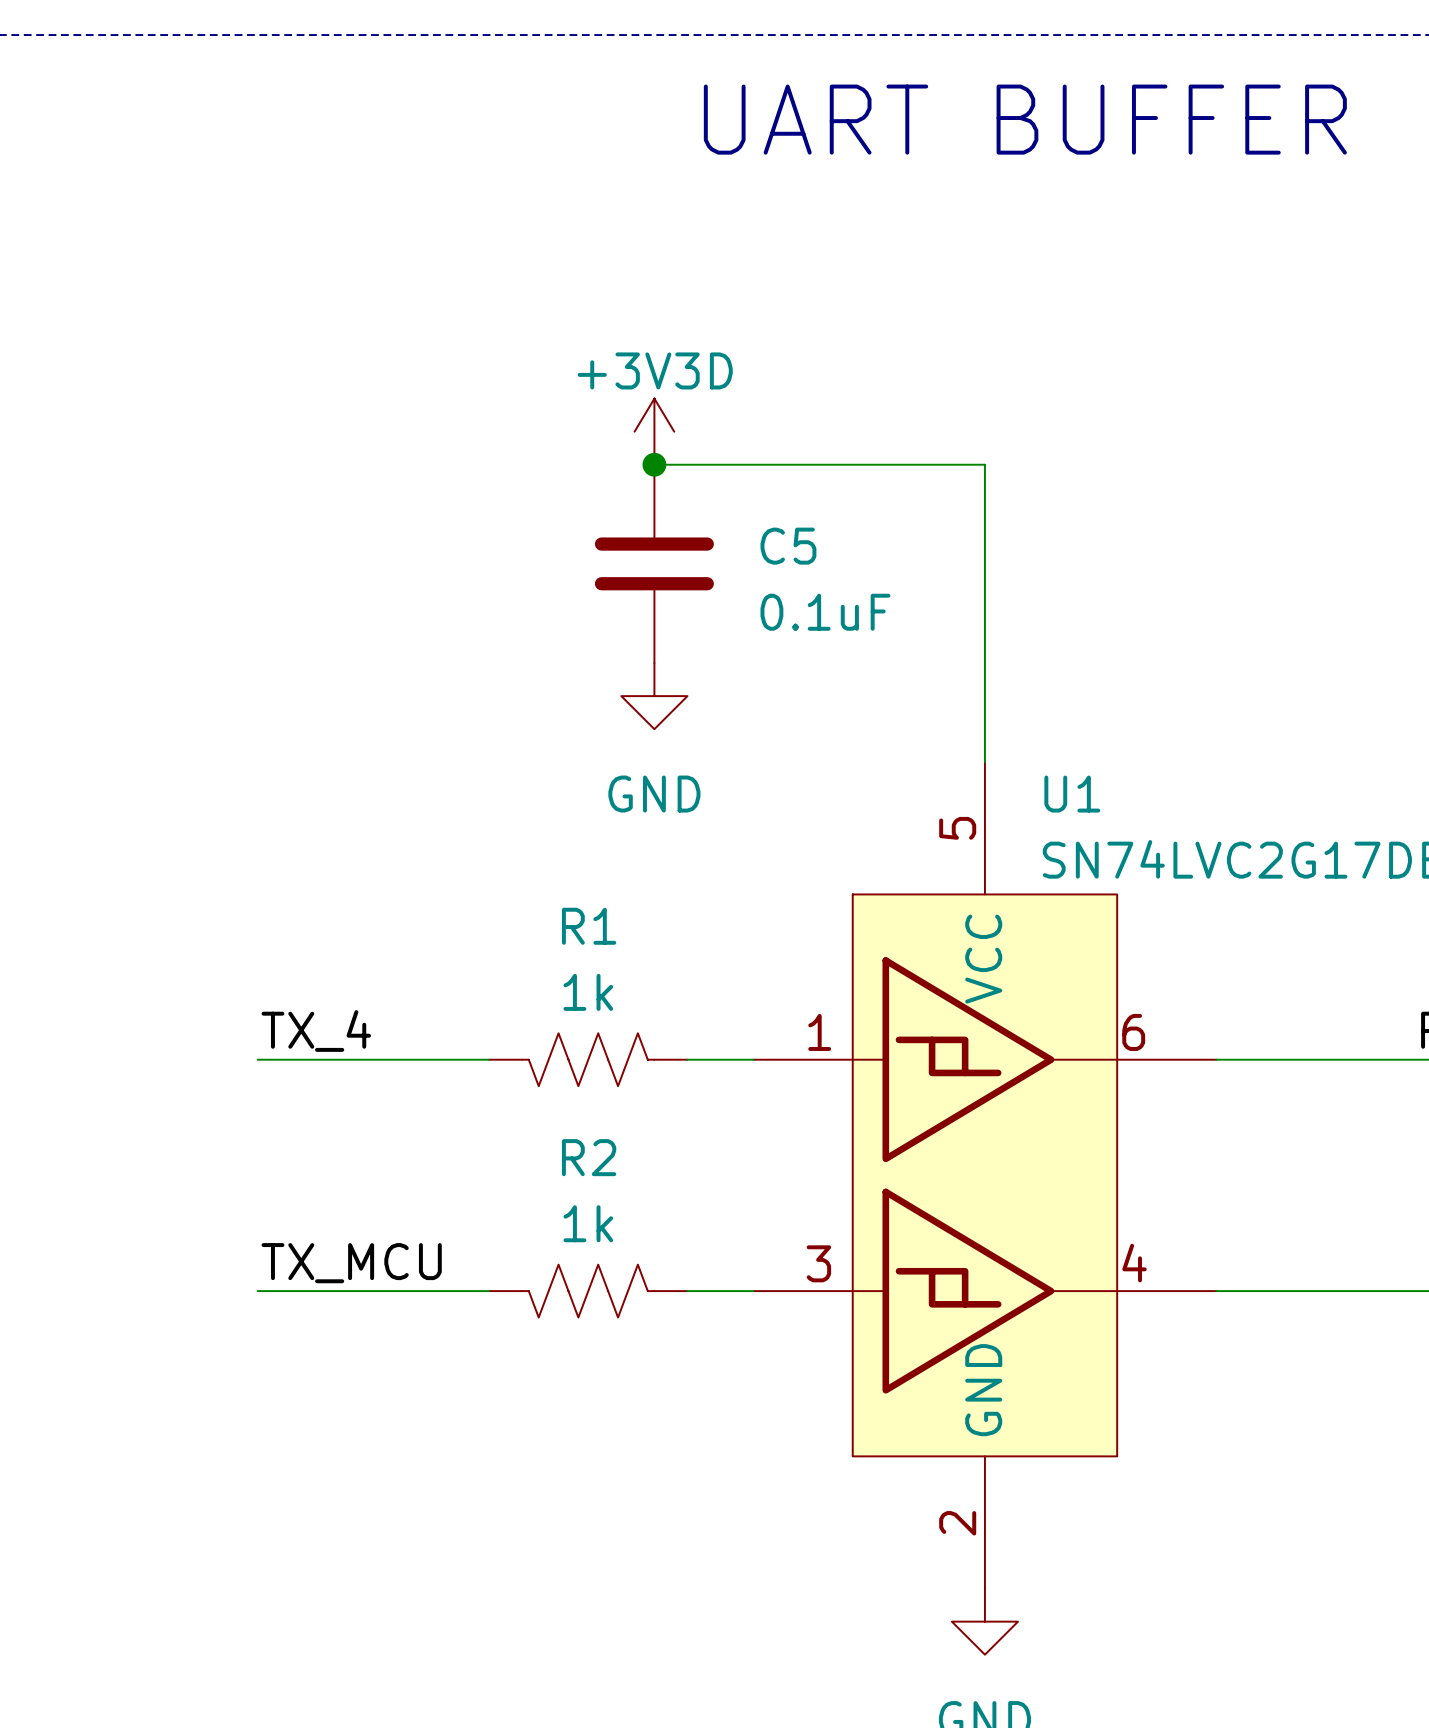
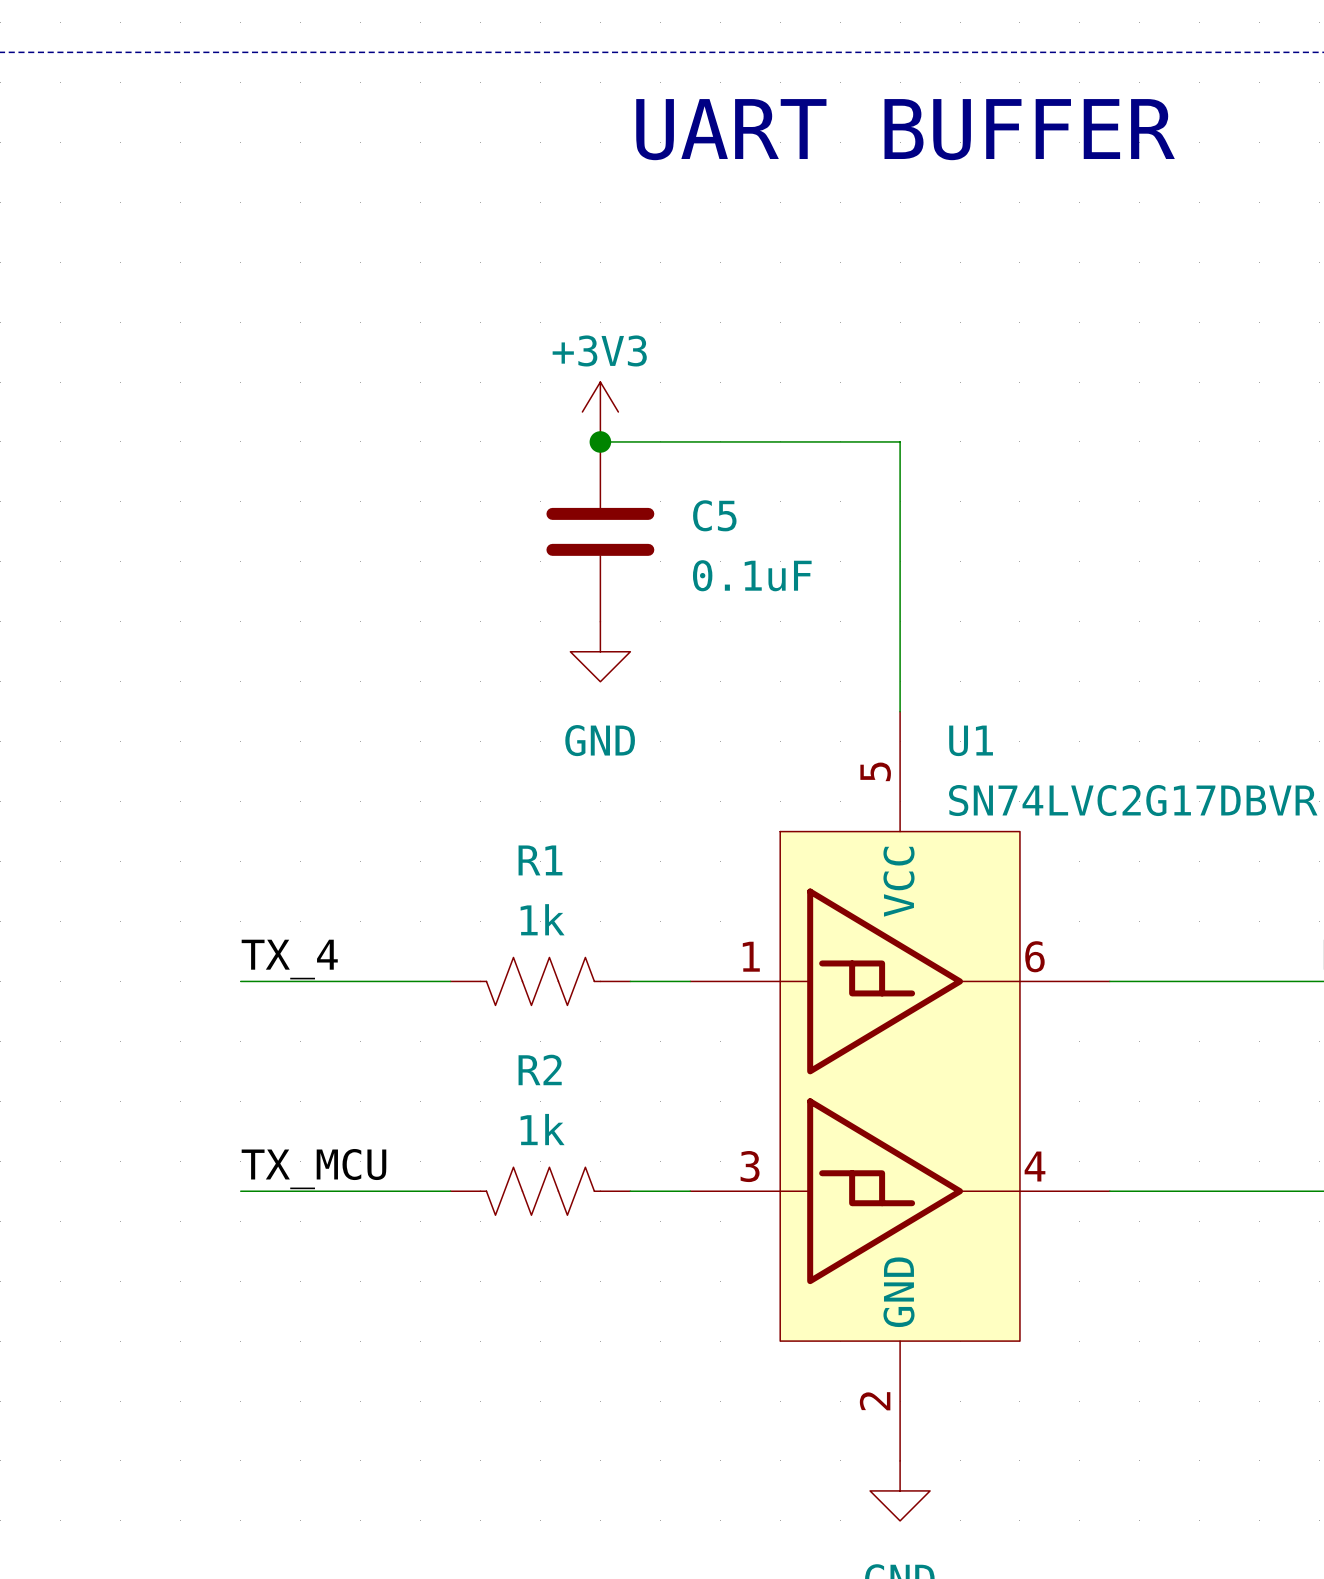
power symbol: +3V3D (654, 431) -> +3V3 (600, 412)

